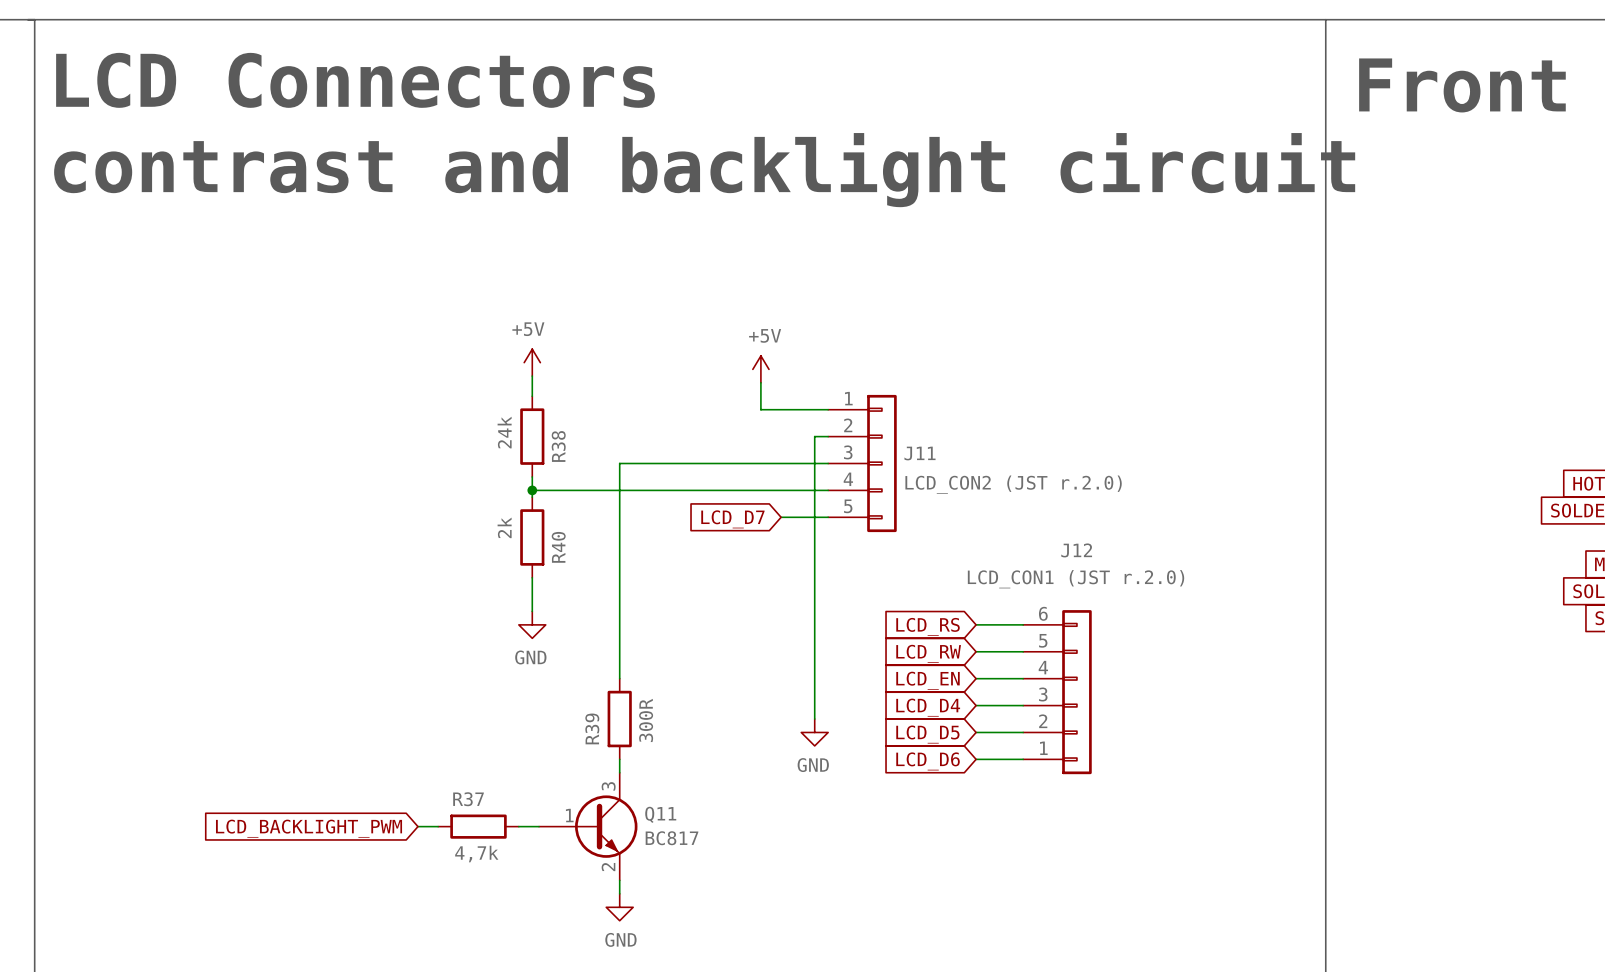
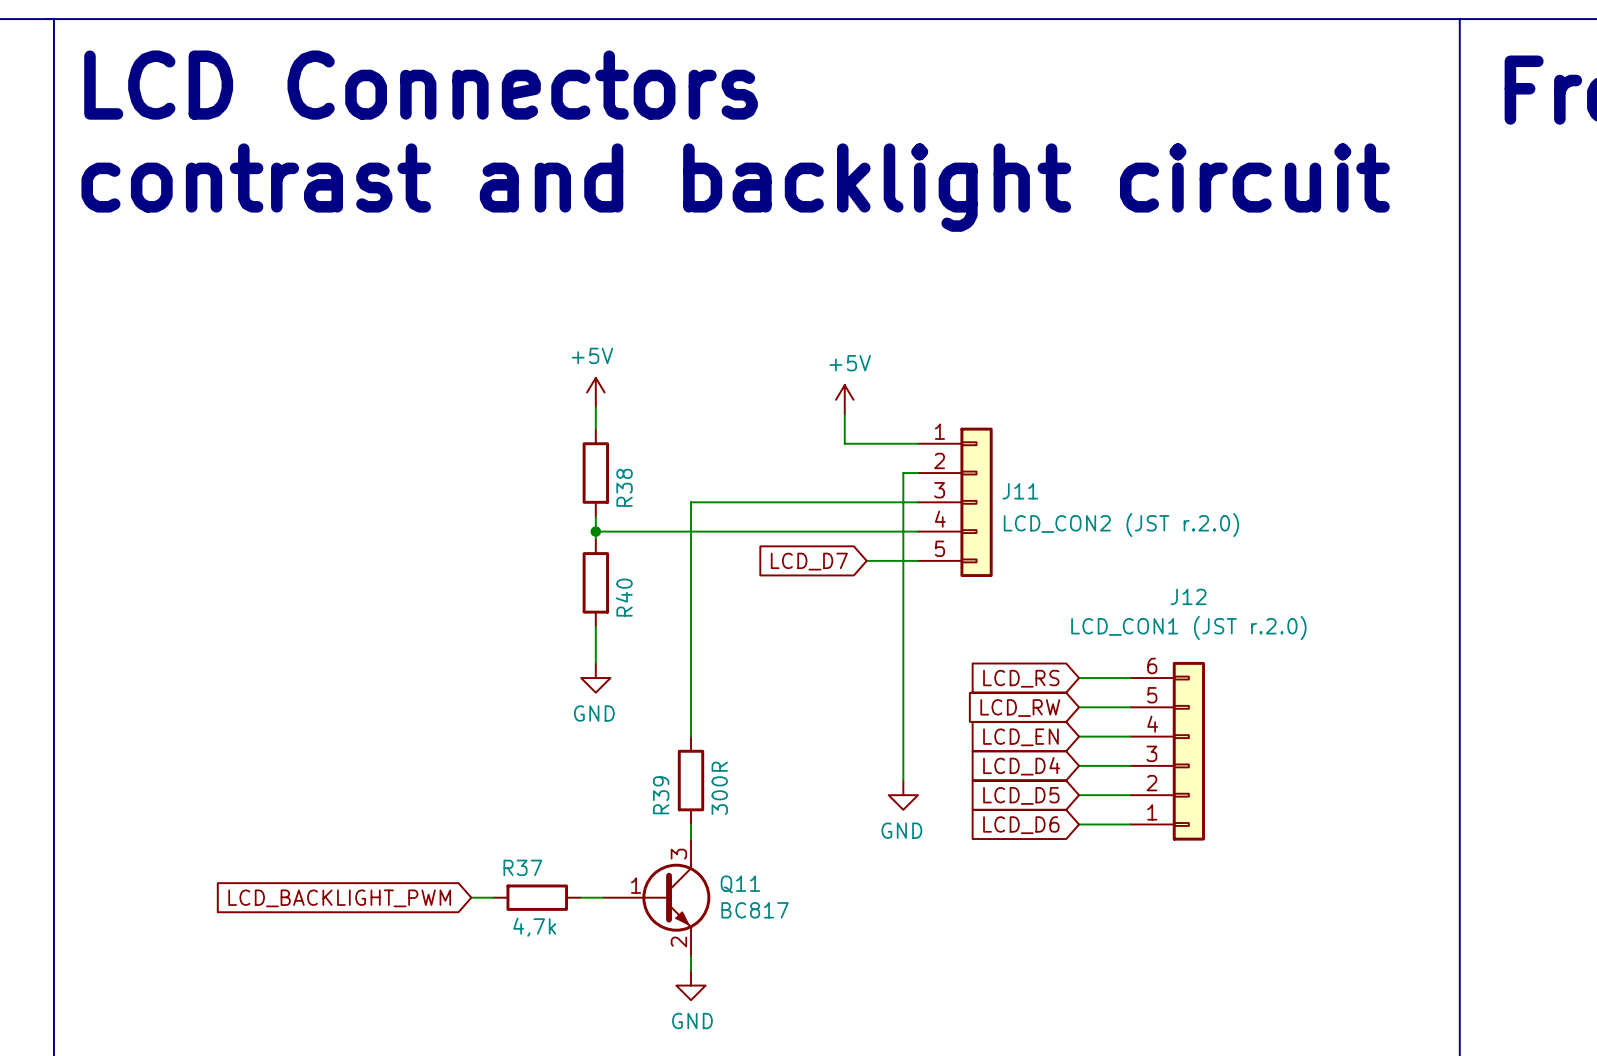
R38 value: 24k (504, 432) -> none
R40 value: 2k (504, 527) -> none

